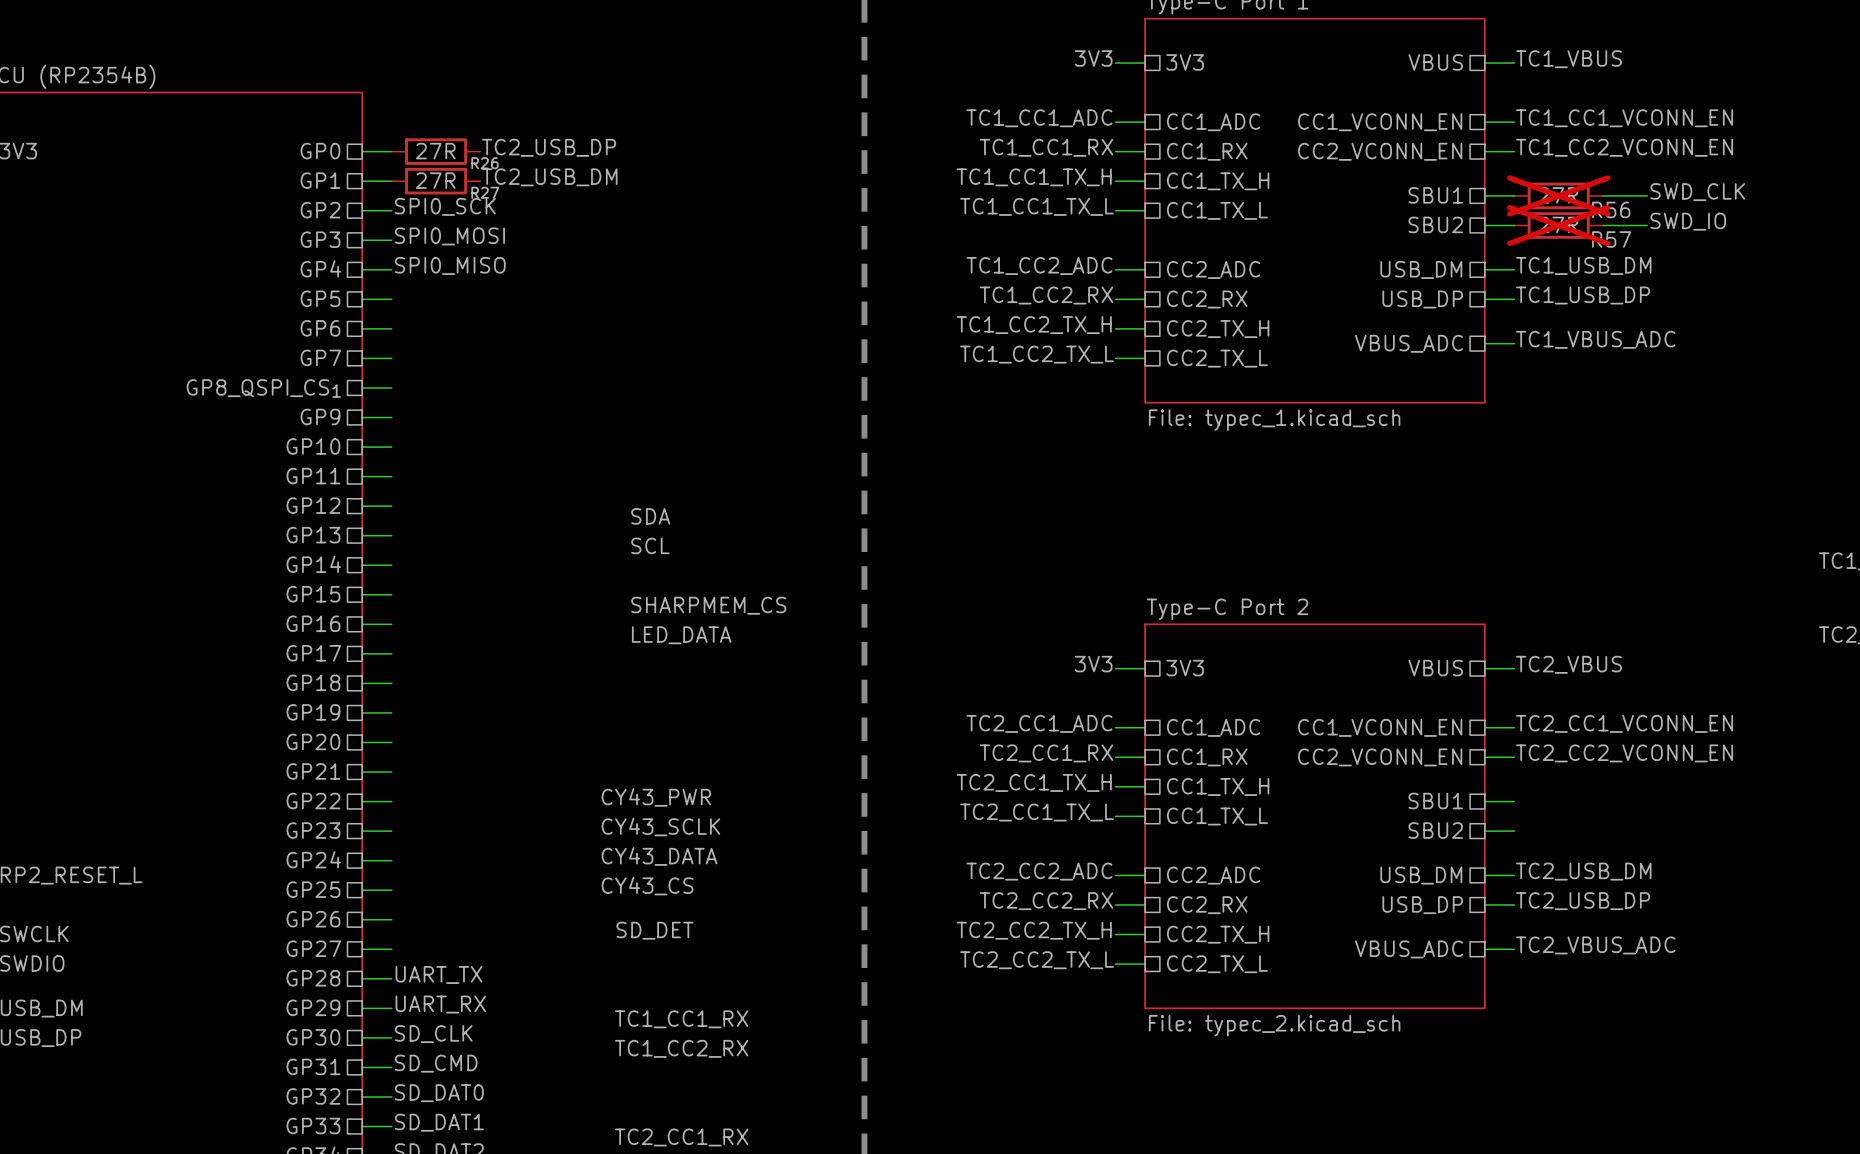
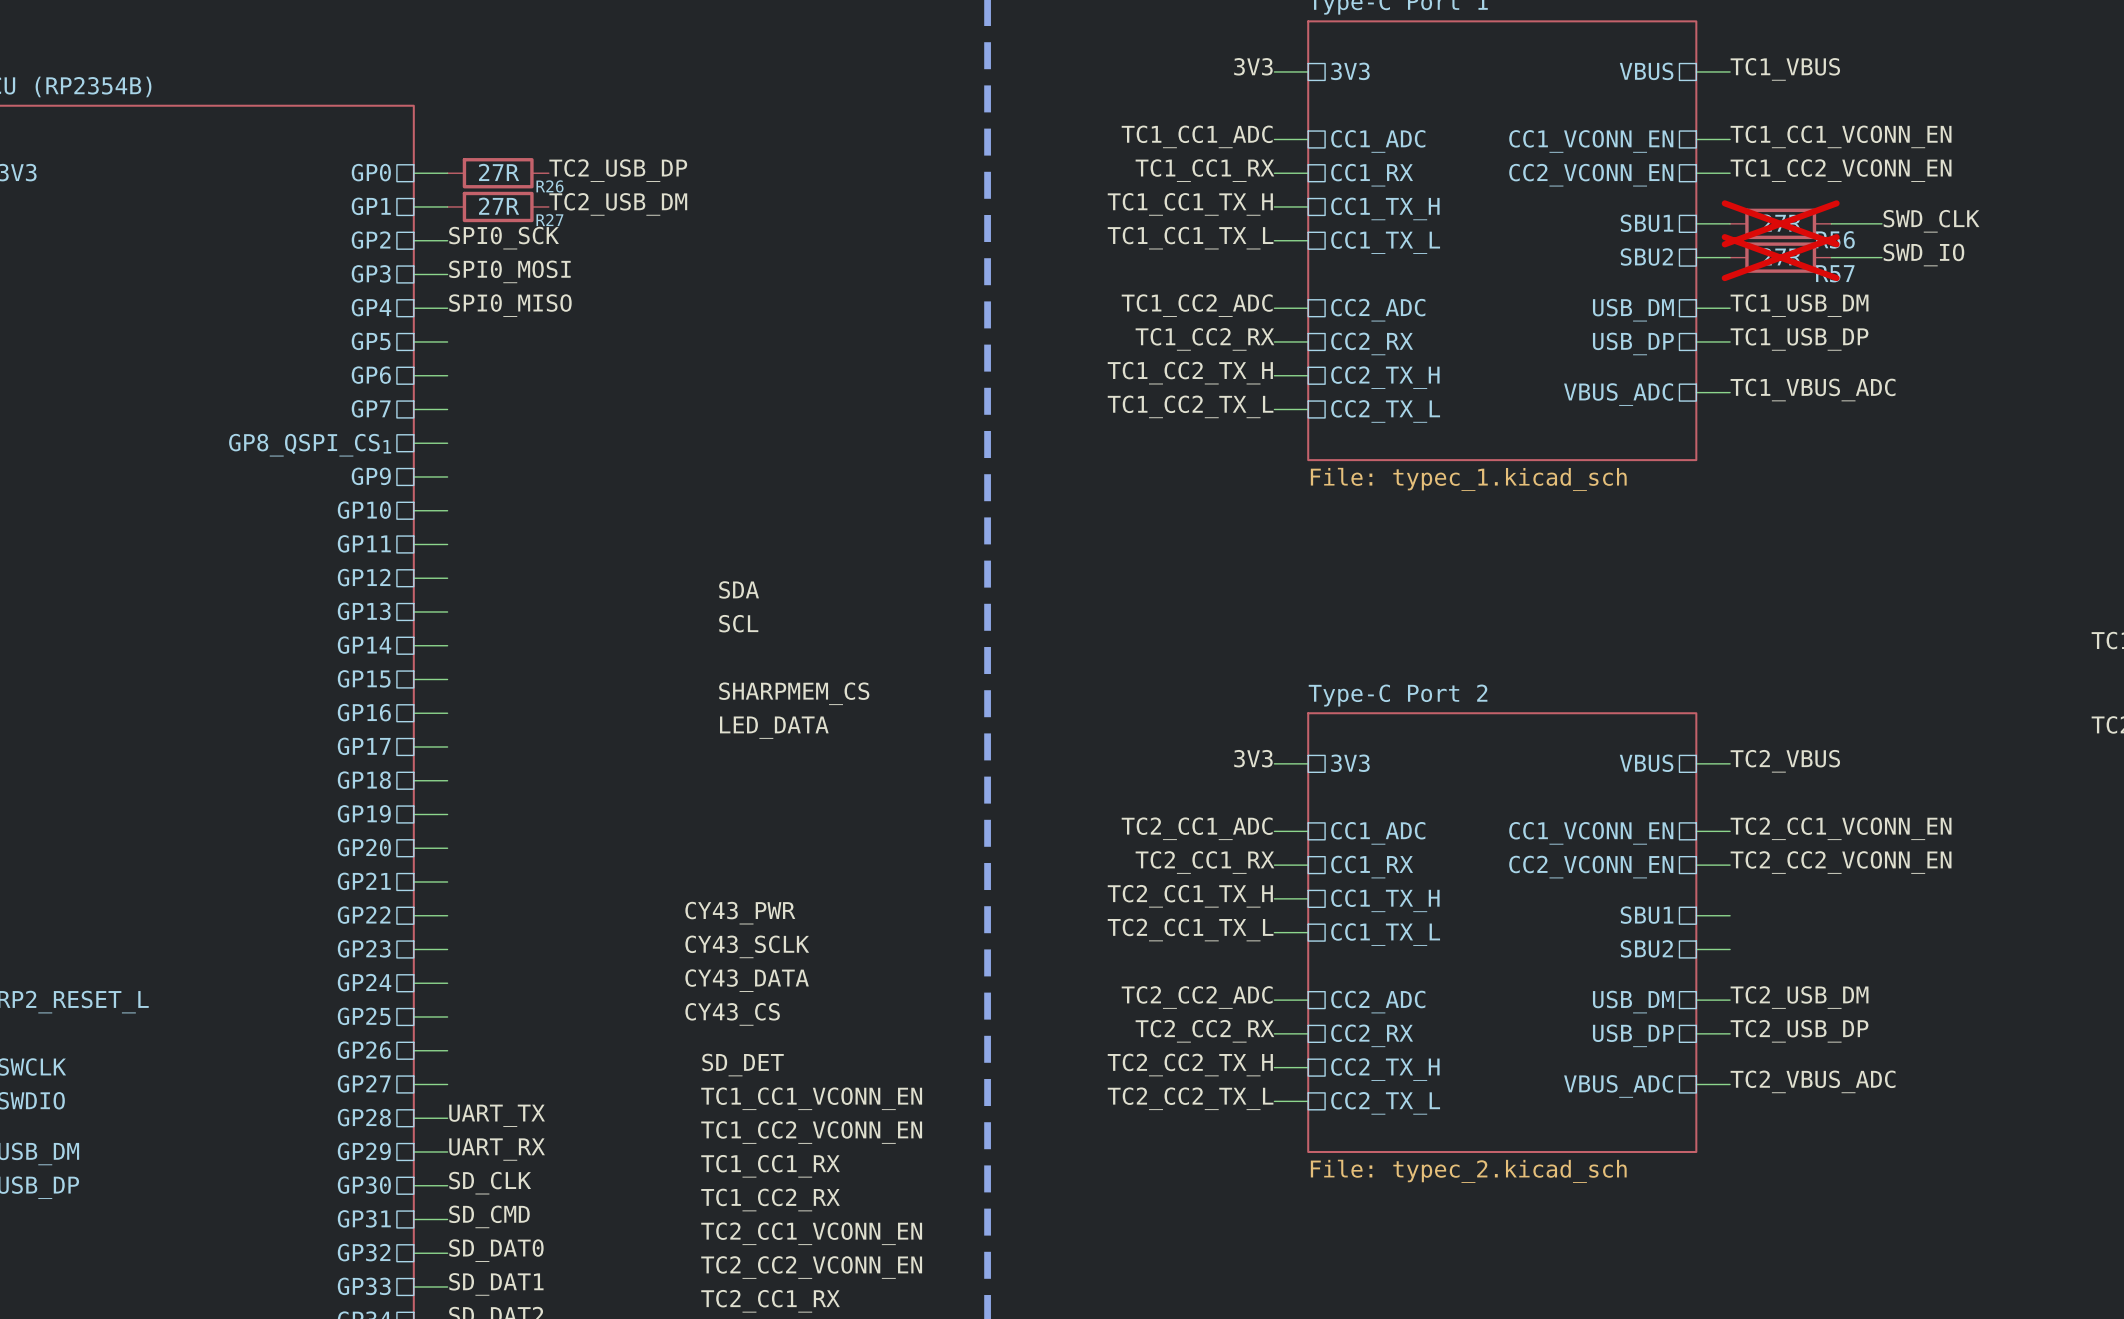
label: none -> TC1_CC1_VCONN_EN (811, 1098)
label: none -> TC1_CC2_VCONN_EN (811, 1132)
label: none -> TC2_CC1_VCONN_EN (811, 1233)
label: none -> TC2_CC2_VCONN_EN (811, 1267)

